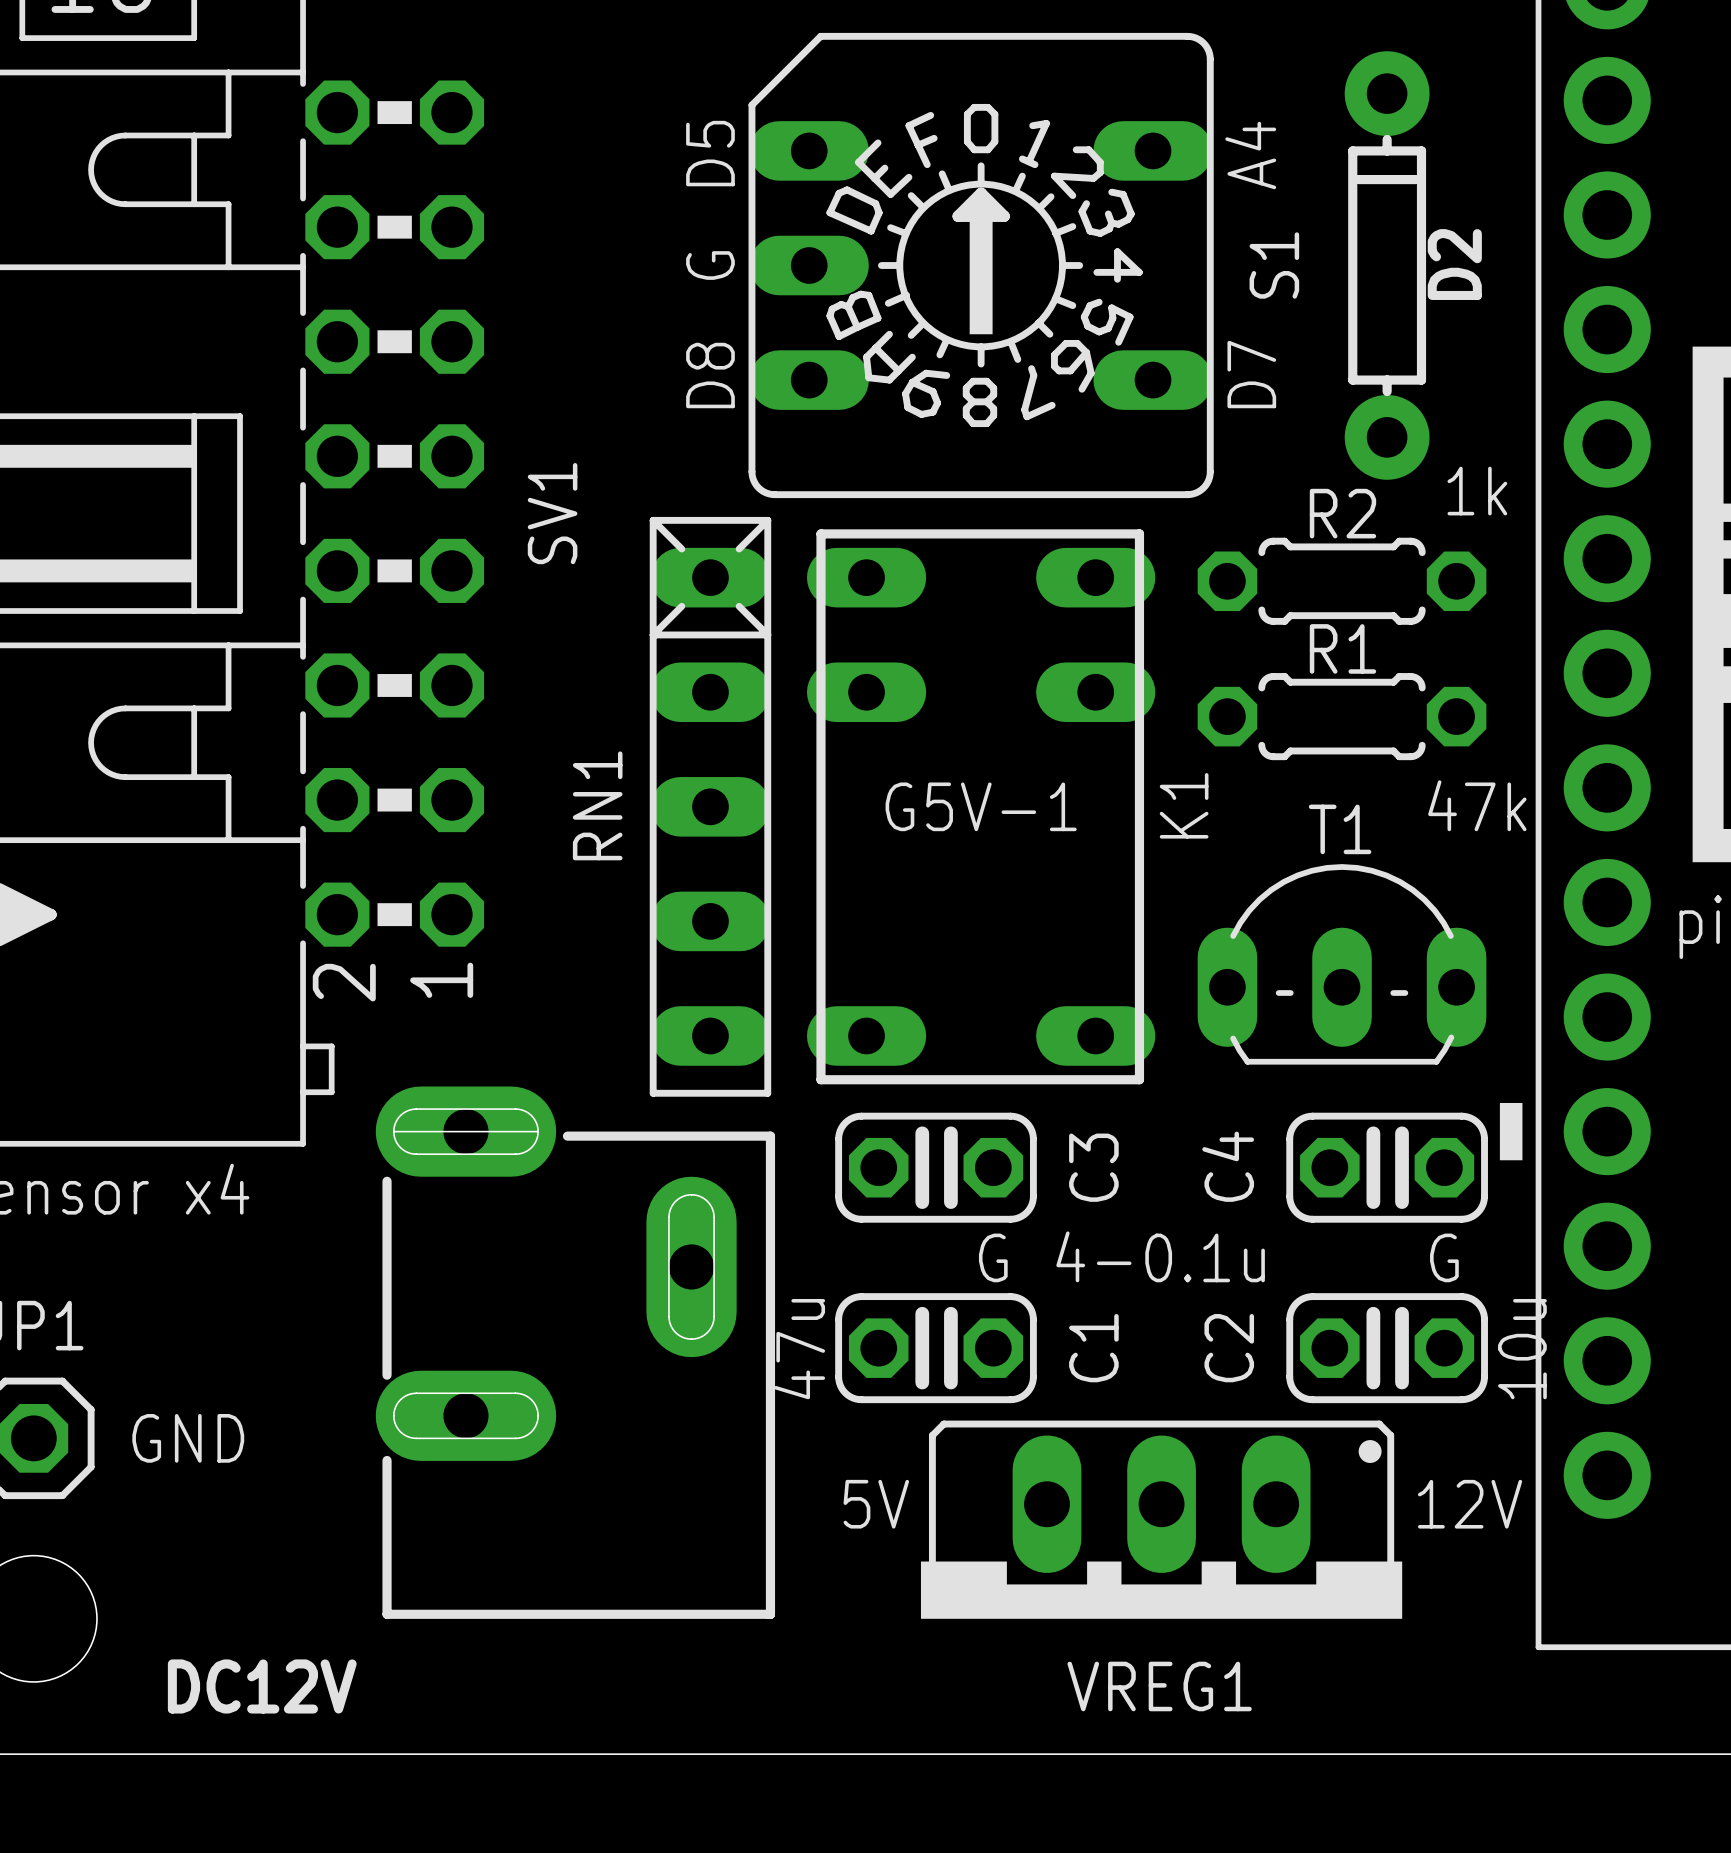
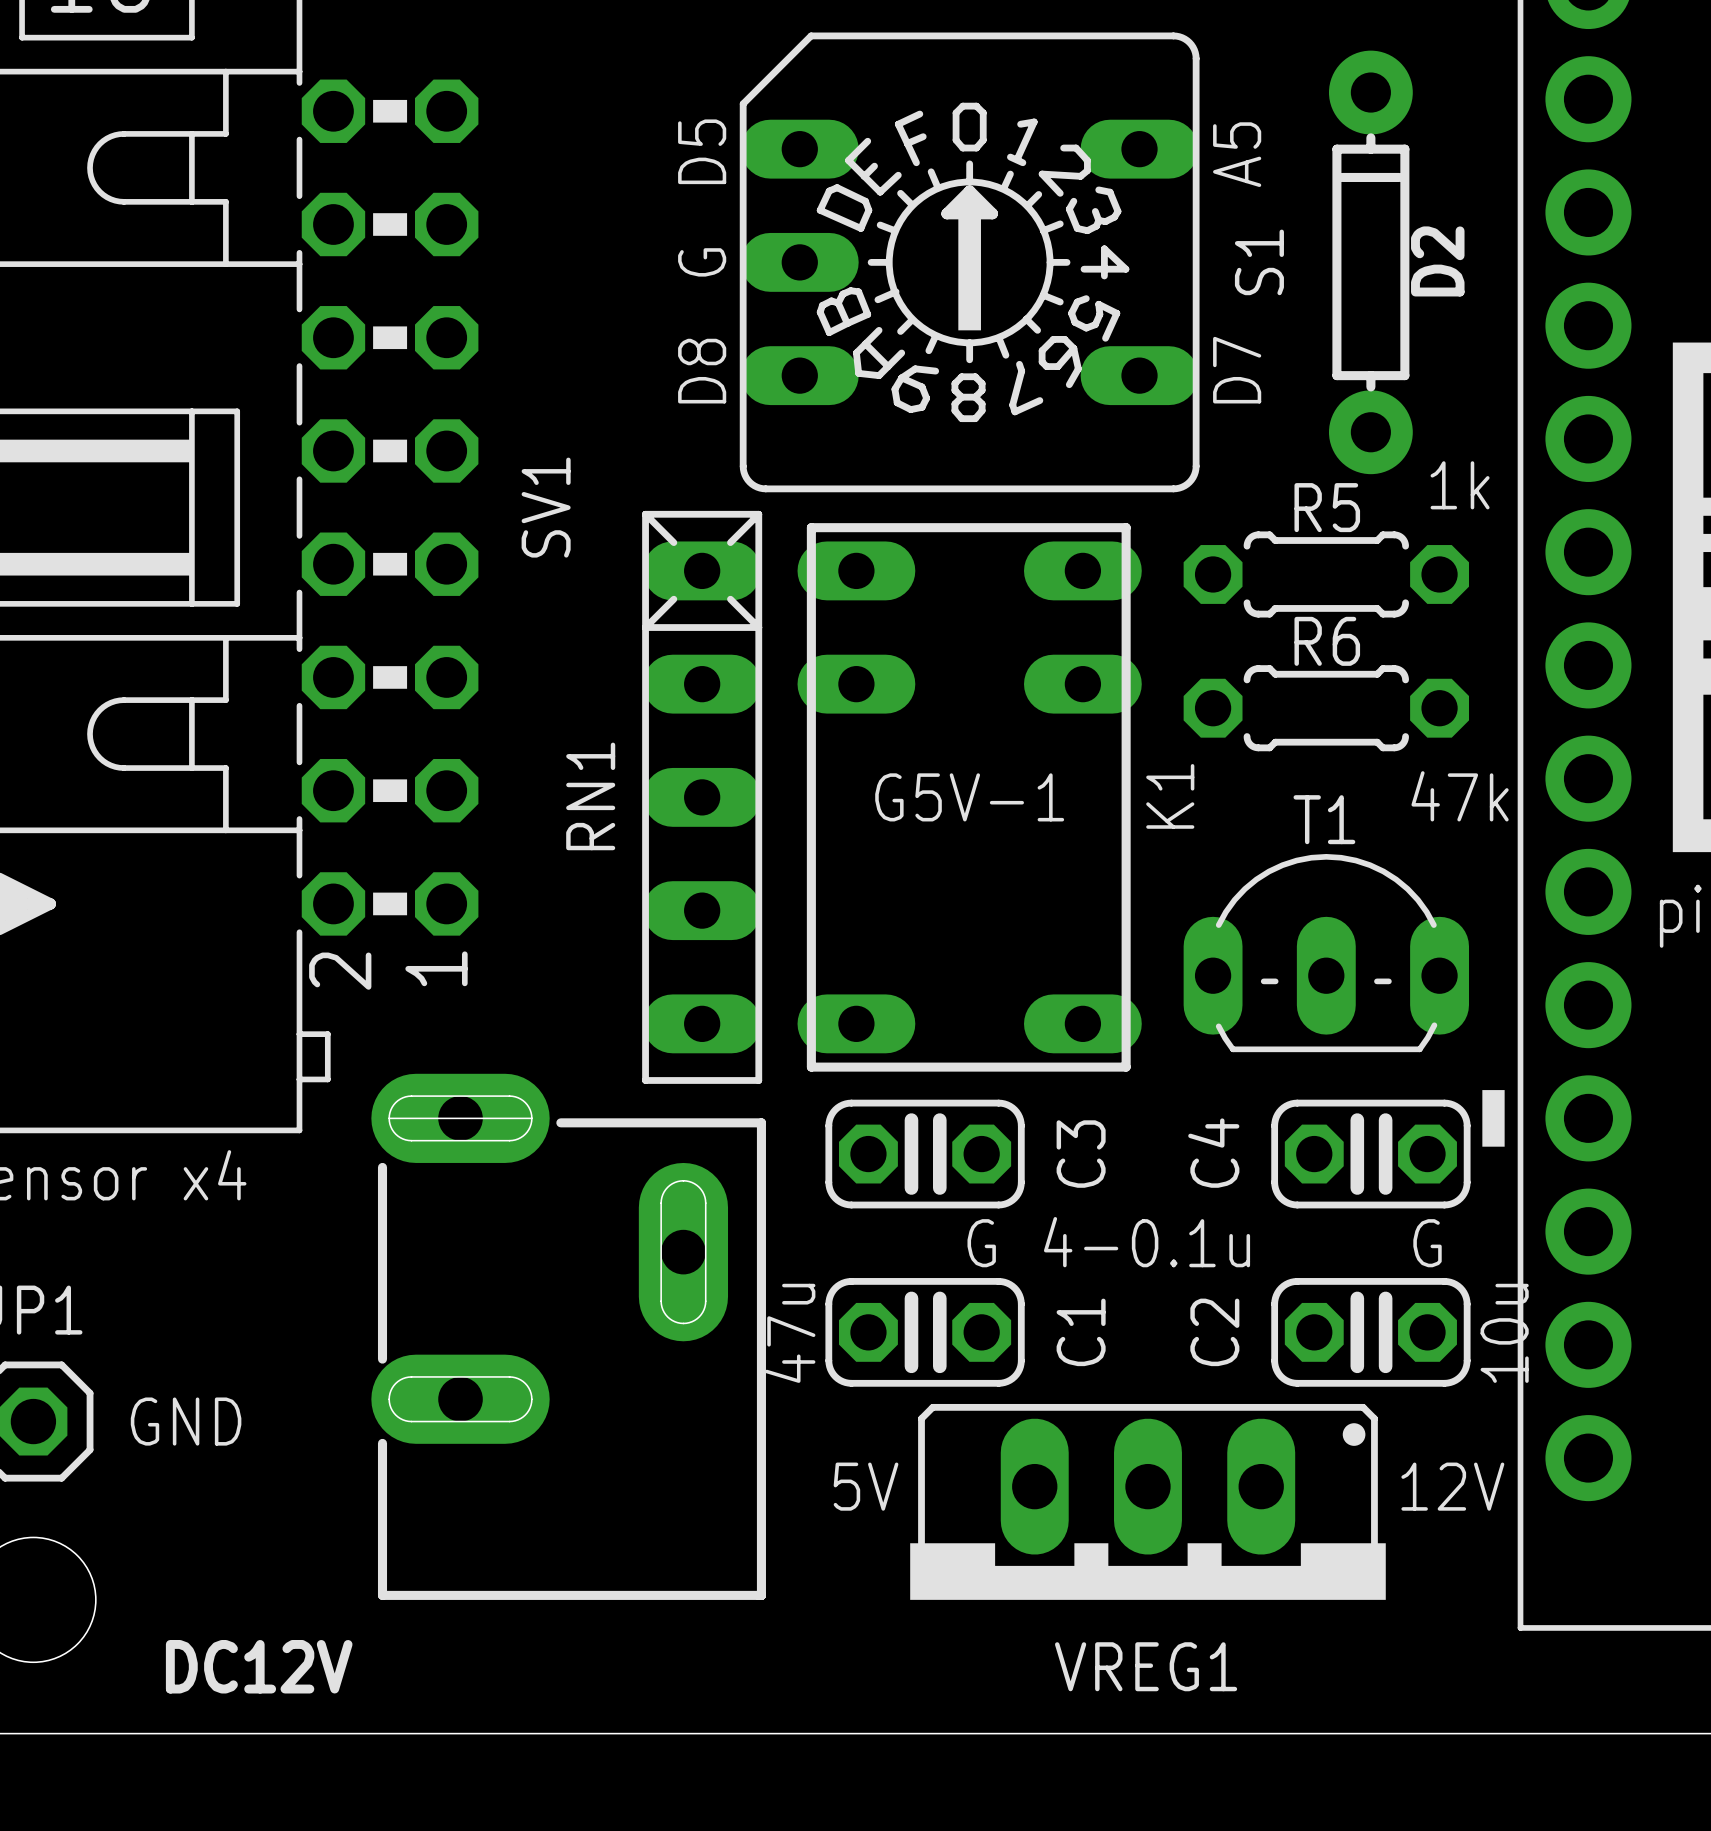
text: A4 (1250, 155) -> A5 (1237, 154)
R2 name: R2 (1342, 513) -> R5 (1327, 507)
R1 name: R1 (1342, 648) -> R6 (1327, 641)

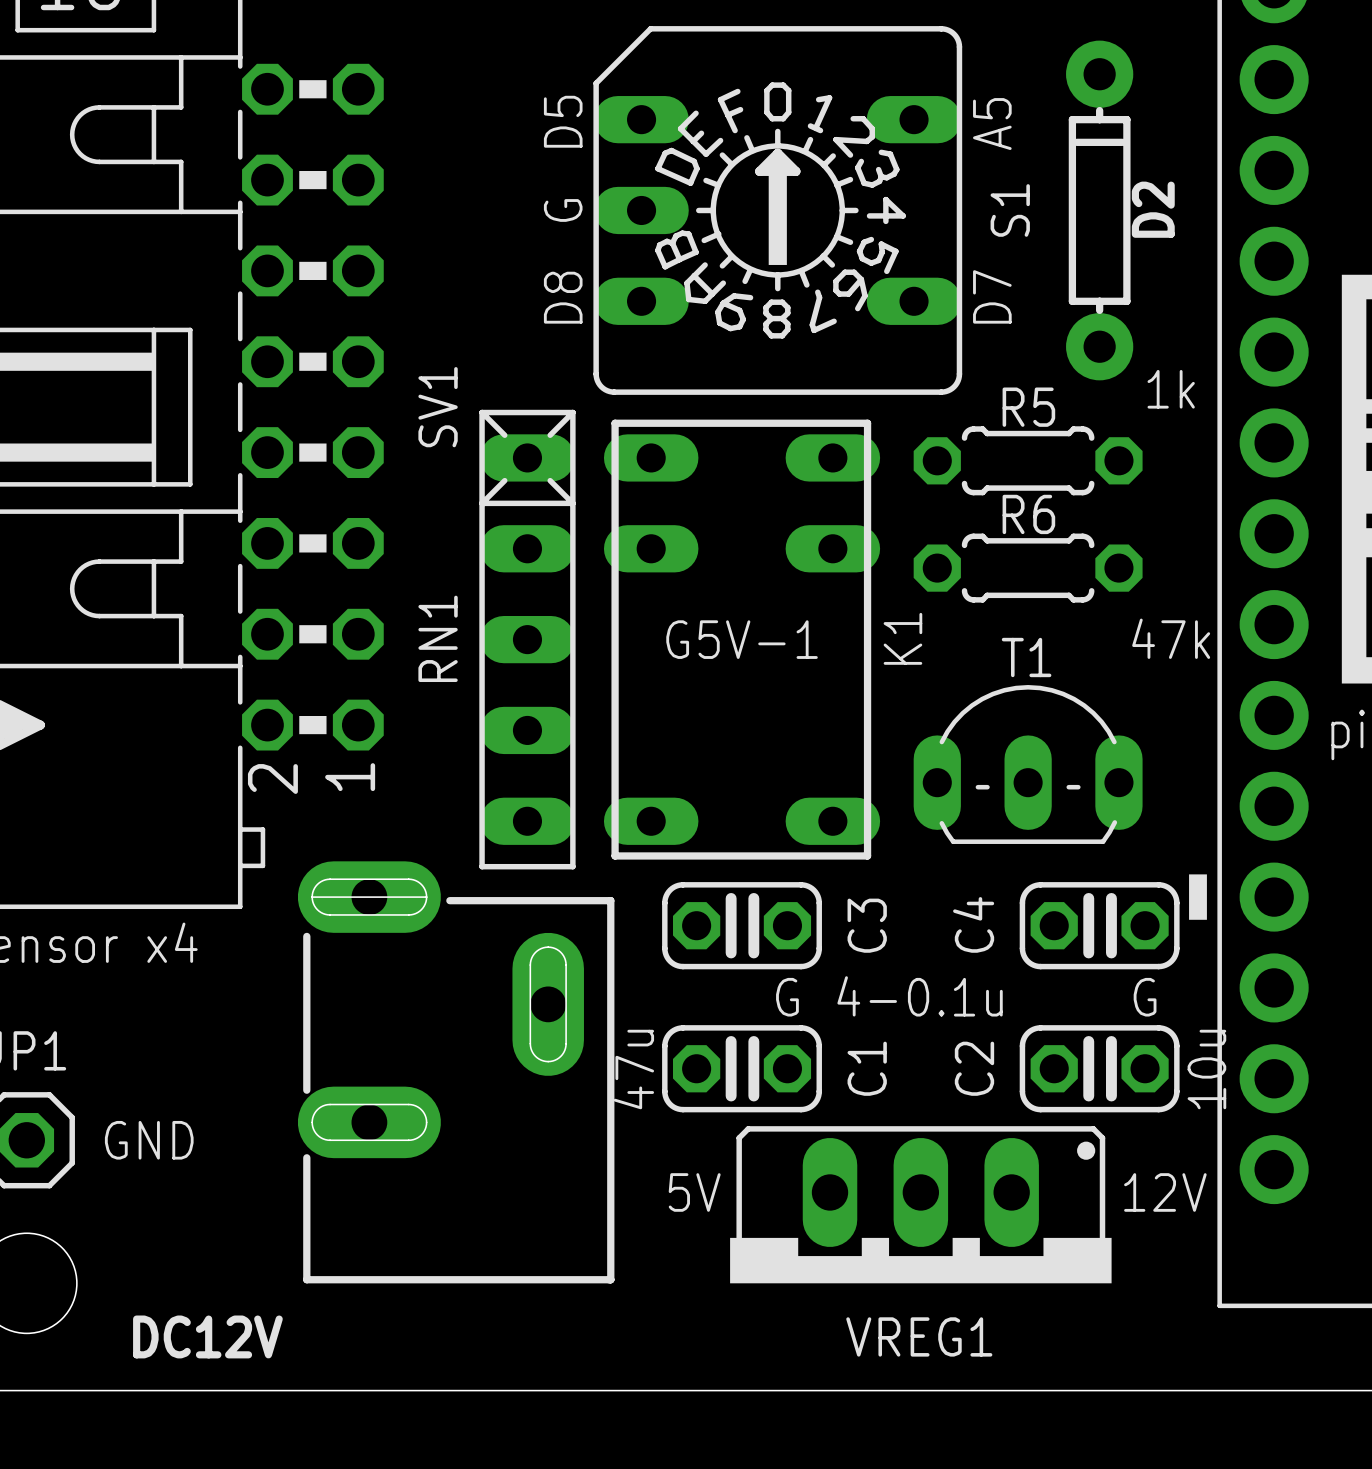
R5 position: (1326, 574) -> (1028, 460)
R6 position: (1326, 708) -> (1028, 568)
RN1 position: (702, 797) -> (527, 639)
text position: G5V-1 (969, 797) -> G5V-1 (742, 639)
K1 position: (969, 797) -> (742, 639)
T1 position: (1326, 953) -> (1028, 764)

